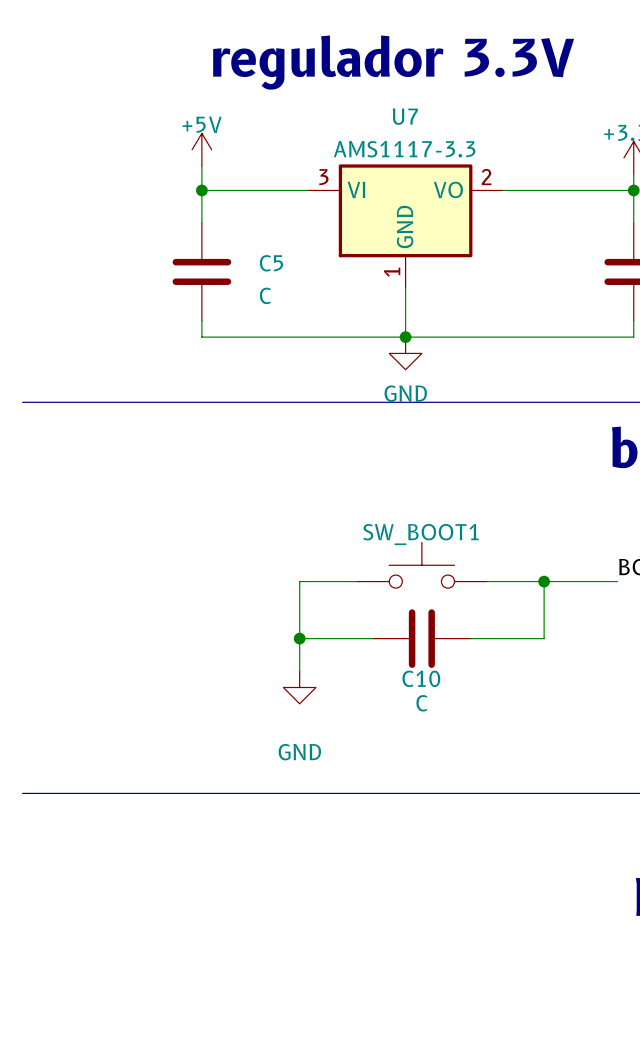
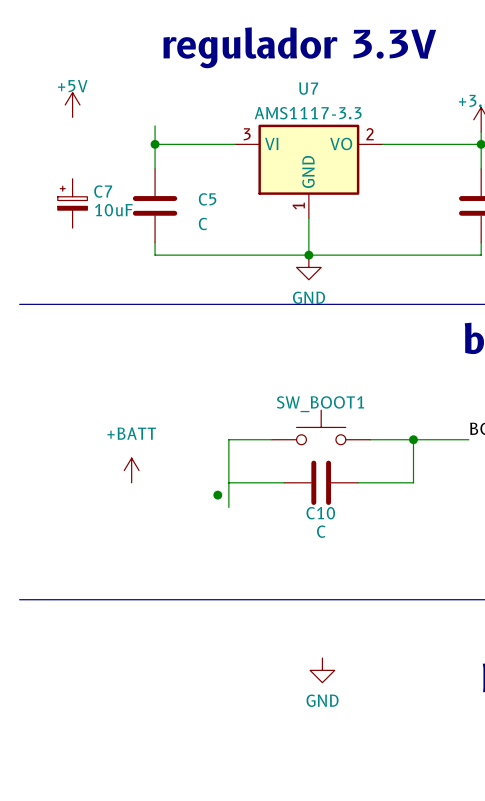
power symbol position: +5V (201, 149) -> +5V (72, 104)
C7: none -> 10uF (72, 203)
power symbol: none -> +BATT (131, 470)
junction position: (299, 638) -> (217, 495)
power symbol: GND (299, 687) -> none
power symbol: none -> GND (322, 670)

